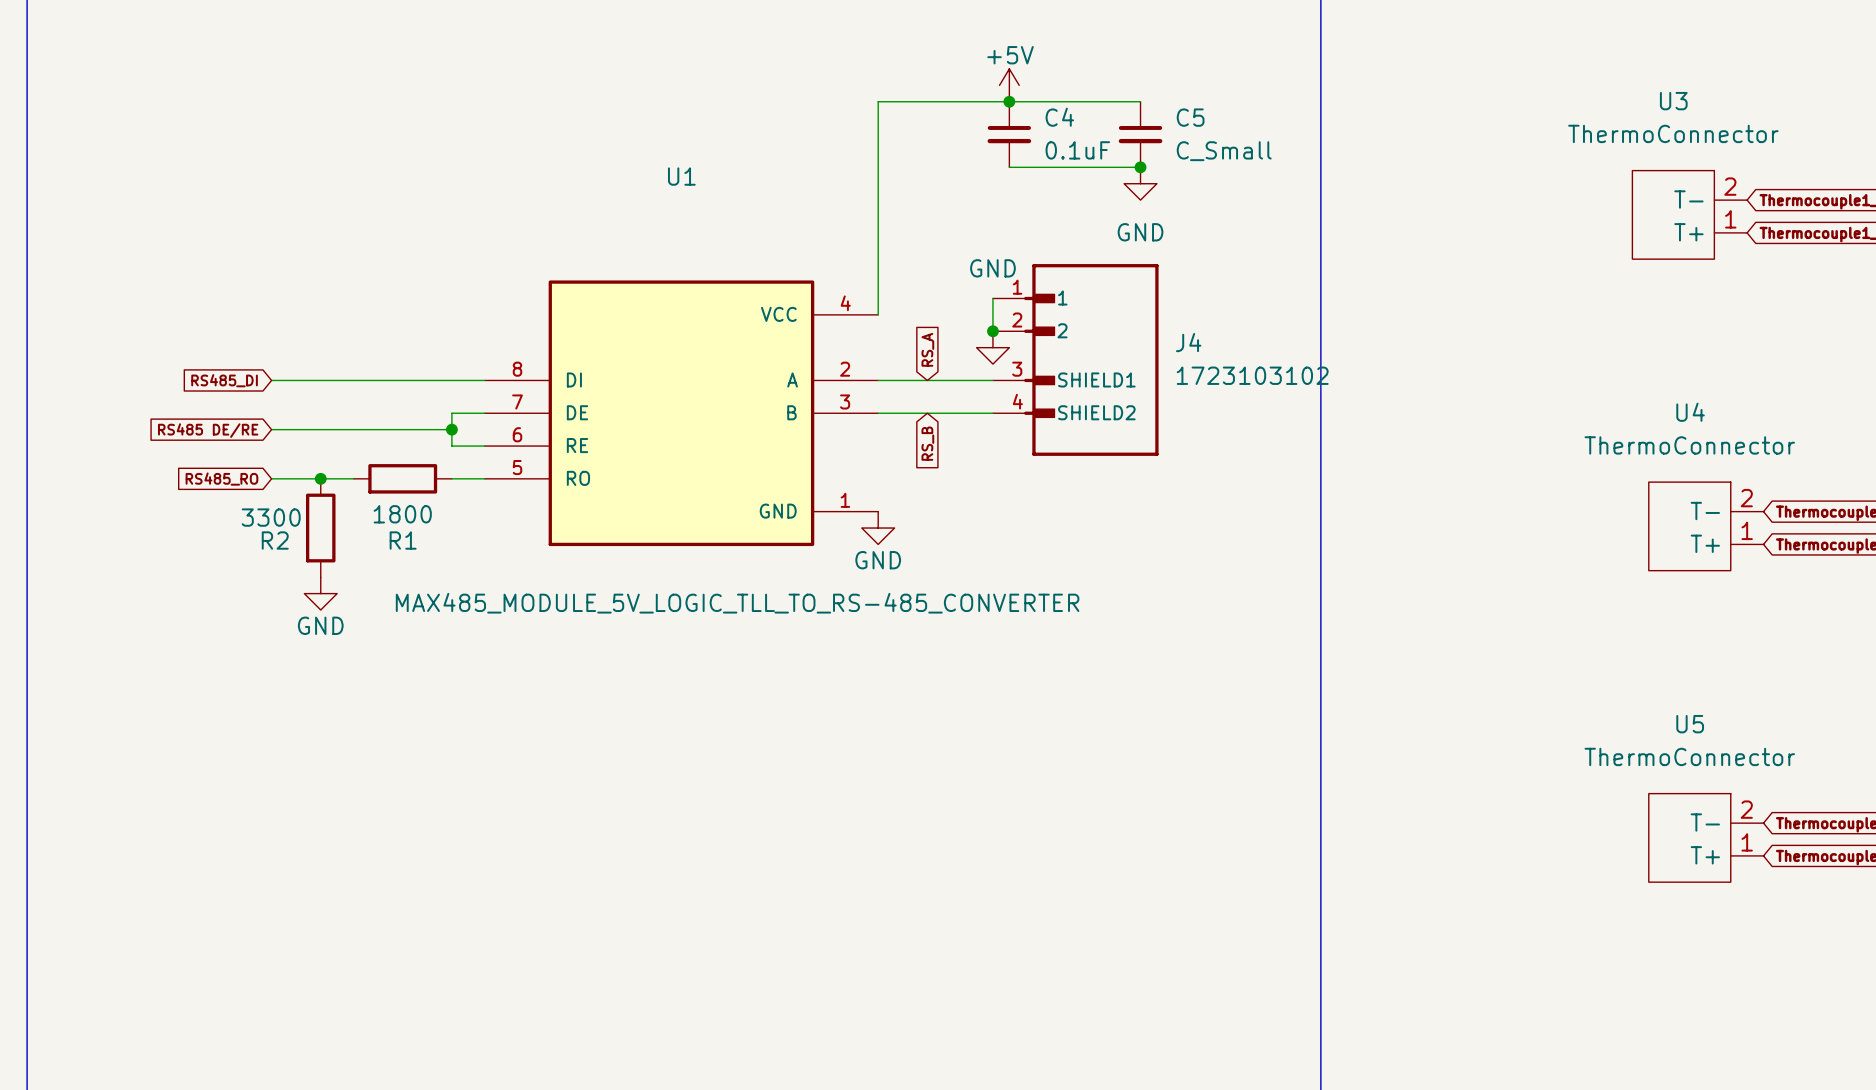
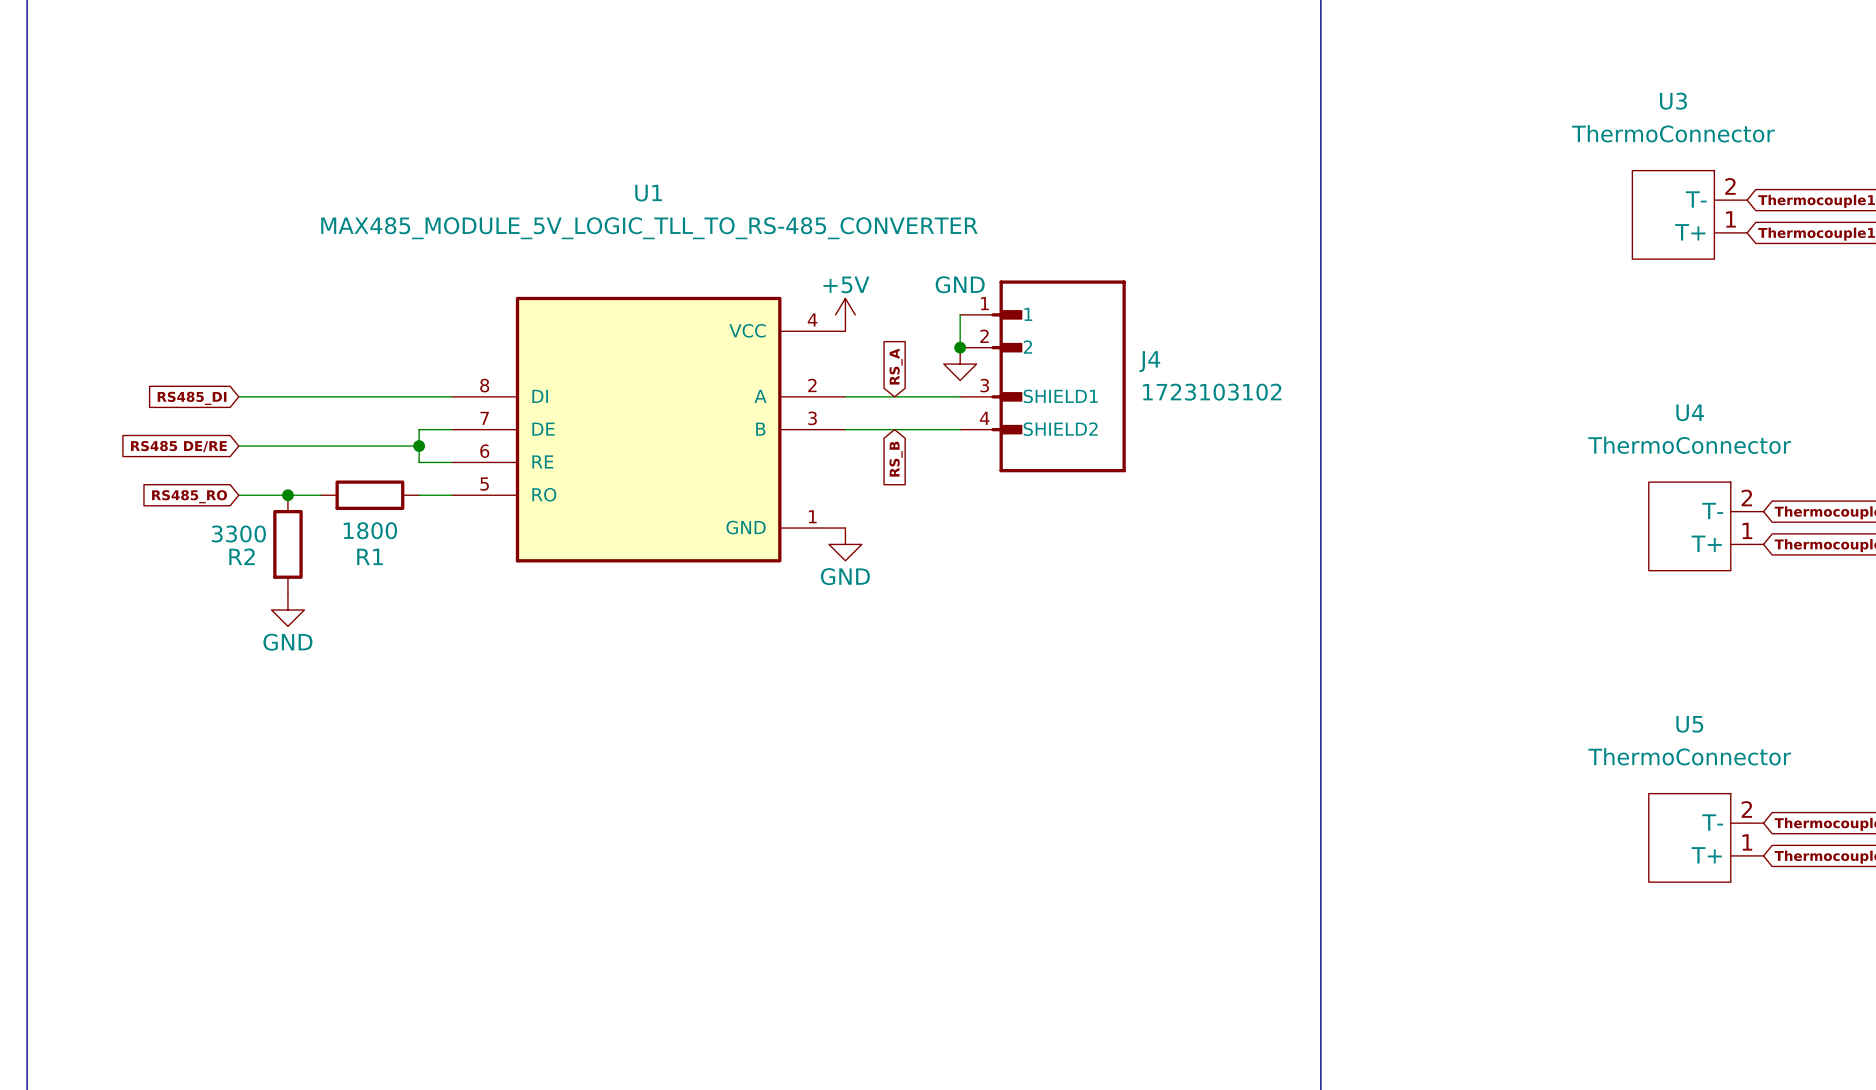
power symbol position: +5V (1009, 85) -> +5V (845, 314)
junction: (1009, 101) -> none
wire: (1140, 101) (878, 101) (878, 314) -> none
C4: 0.1uF (1009, 134) -> none
C5: C_Small (1140, 134) -> none
wire: (1009, 167) (1140, 167) -> none
junction: (1140, 167) -> none
power symbol: GND (1140, 183) -> none
wire: (992, 298) (992, 331) -> (960, 314) (960, 347)
junction position: (992, 331) -> (960, 347)
power symbol position: GND (992, 347) -> GND (960, 364)
global label position: RS_A (927, 349) -> RS_A (896, 366)
J4 position: (1075, 359) -> (1042, 376)
global label position: RS485_DI (224, 380) -> RS485_DI (192, 398)
wire: (271, 380) (484, 380) -> (238, 396) (451, 396)
wire: (878, 380) (992, 380) -> (845, 396) (960, 396)
wire: (484, 413) (451, 413) (451, 446) (484, 446) -> none
U1 position: (681, 413) -> (648, 429)
wire: (878, 413) (992, 413) -> (845, 429) (960, 429)
wire: (271, 429) (419, 429) -> (451, 462) (419, 462) (419, 429)
junction position: (451, 429) -> (419, 446)
global label position: RS485 DE/RE (208, 430) -> RS485 DE/RE (178, 446)
global label position: RS_B (927, 443) -> RS_B (896, 459)
wire: none -> (238, 446) (419, 446)
wire: (271, 478) (353, 478) -> (238, 495) (320, 495)
junction position: (320, 478) -> (287, 495)
R1 position: (402, 478) -> (369, 495)
wire: (451, 478) (484, 478) -> (419, 495) (451, 495)
global label position: RS485_RO (221, 479) -> RS485_RO (189, 496)
R2 position: (320, 528) -> (287, 544)
power symbol position: GND (878, 528) -> GND (845, 544)
power symbol position: GND (320, 593) -> GND (287, 610)
U1 value position: MAX485_MODULE_5V_LOGIC_TLL_TO_RS-485_CONVERTER (737, 603) -> MAX485_MODULE_5V_LOGIC_TLL_TO_RS-485_CONVERTER (649, 228)

